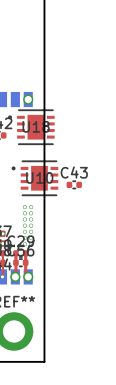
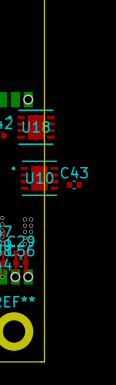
via: (24, 207) -> none
via: (31, 207) -> none
via: (24, 213) -> none
via: (31, 213) -> none
via: none -> (2, 218)
via: none -> (2, 224)
via: none -> (2, 230)
via: (2, 233) -> none
via: none -> (2, 236)

